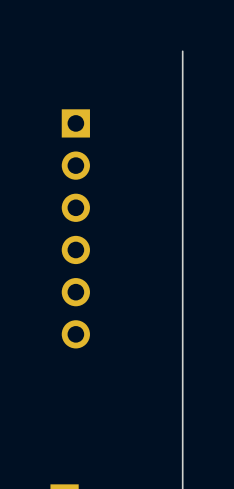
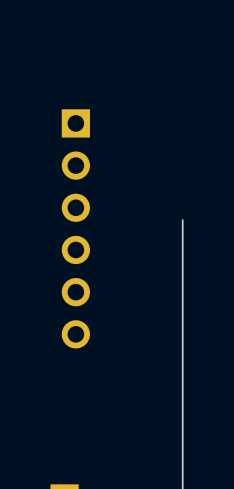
board edge: (182, 51) (182, 220) -> none

